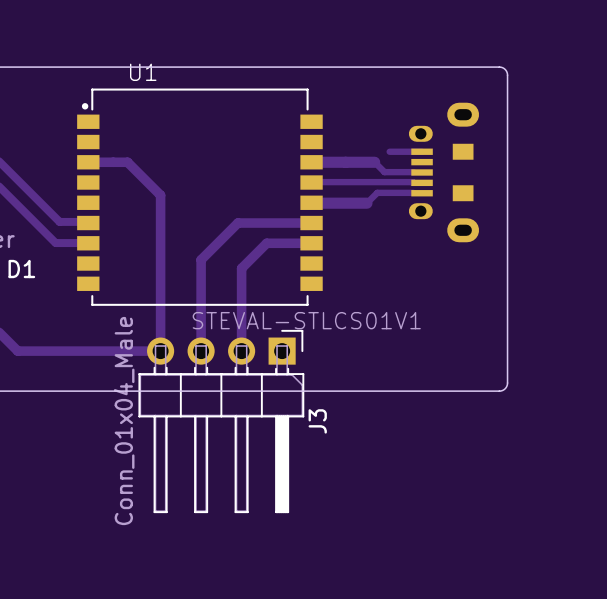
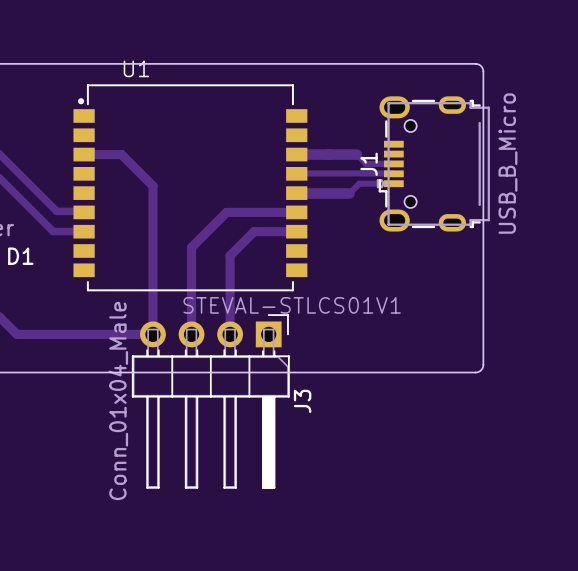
track: (389, 151) (422, 151) -> none
part: (443, 172) -> none
J1: none -> USB_B_Micro (433, 163)

